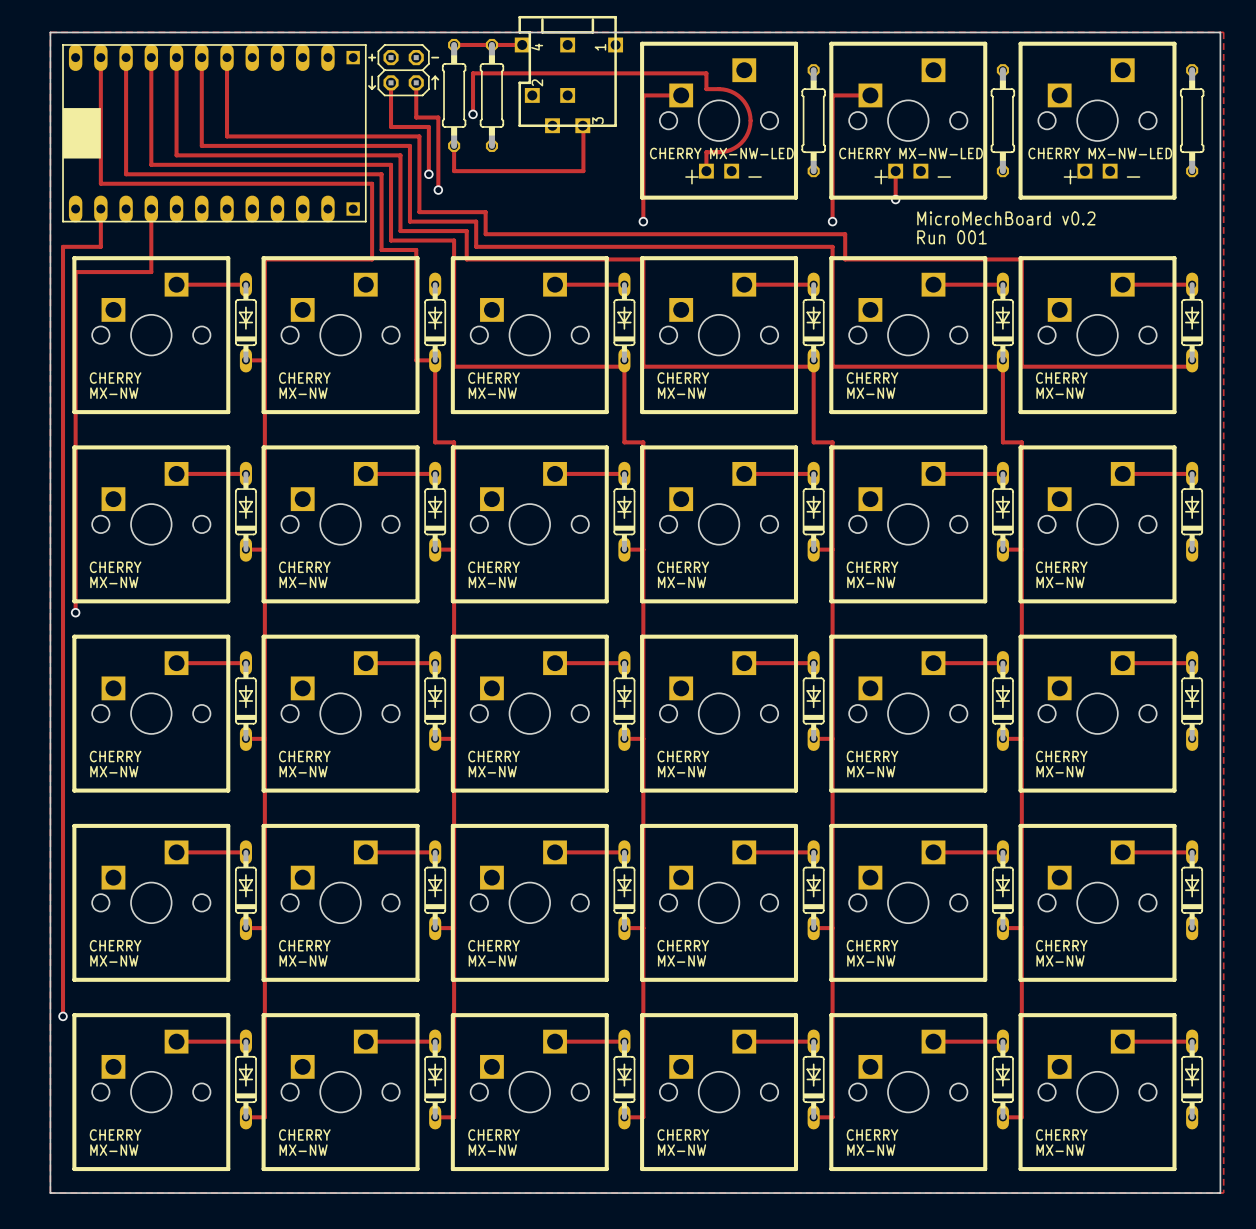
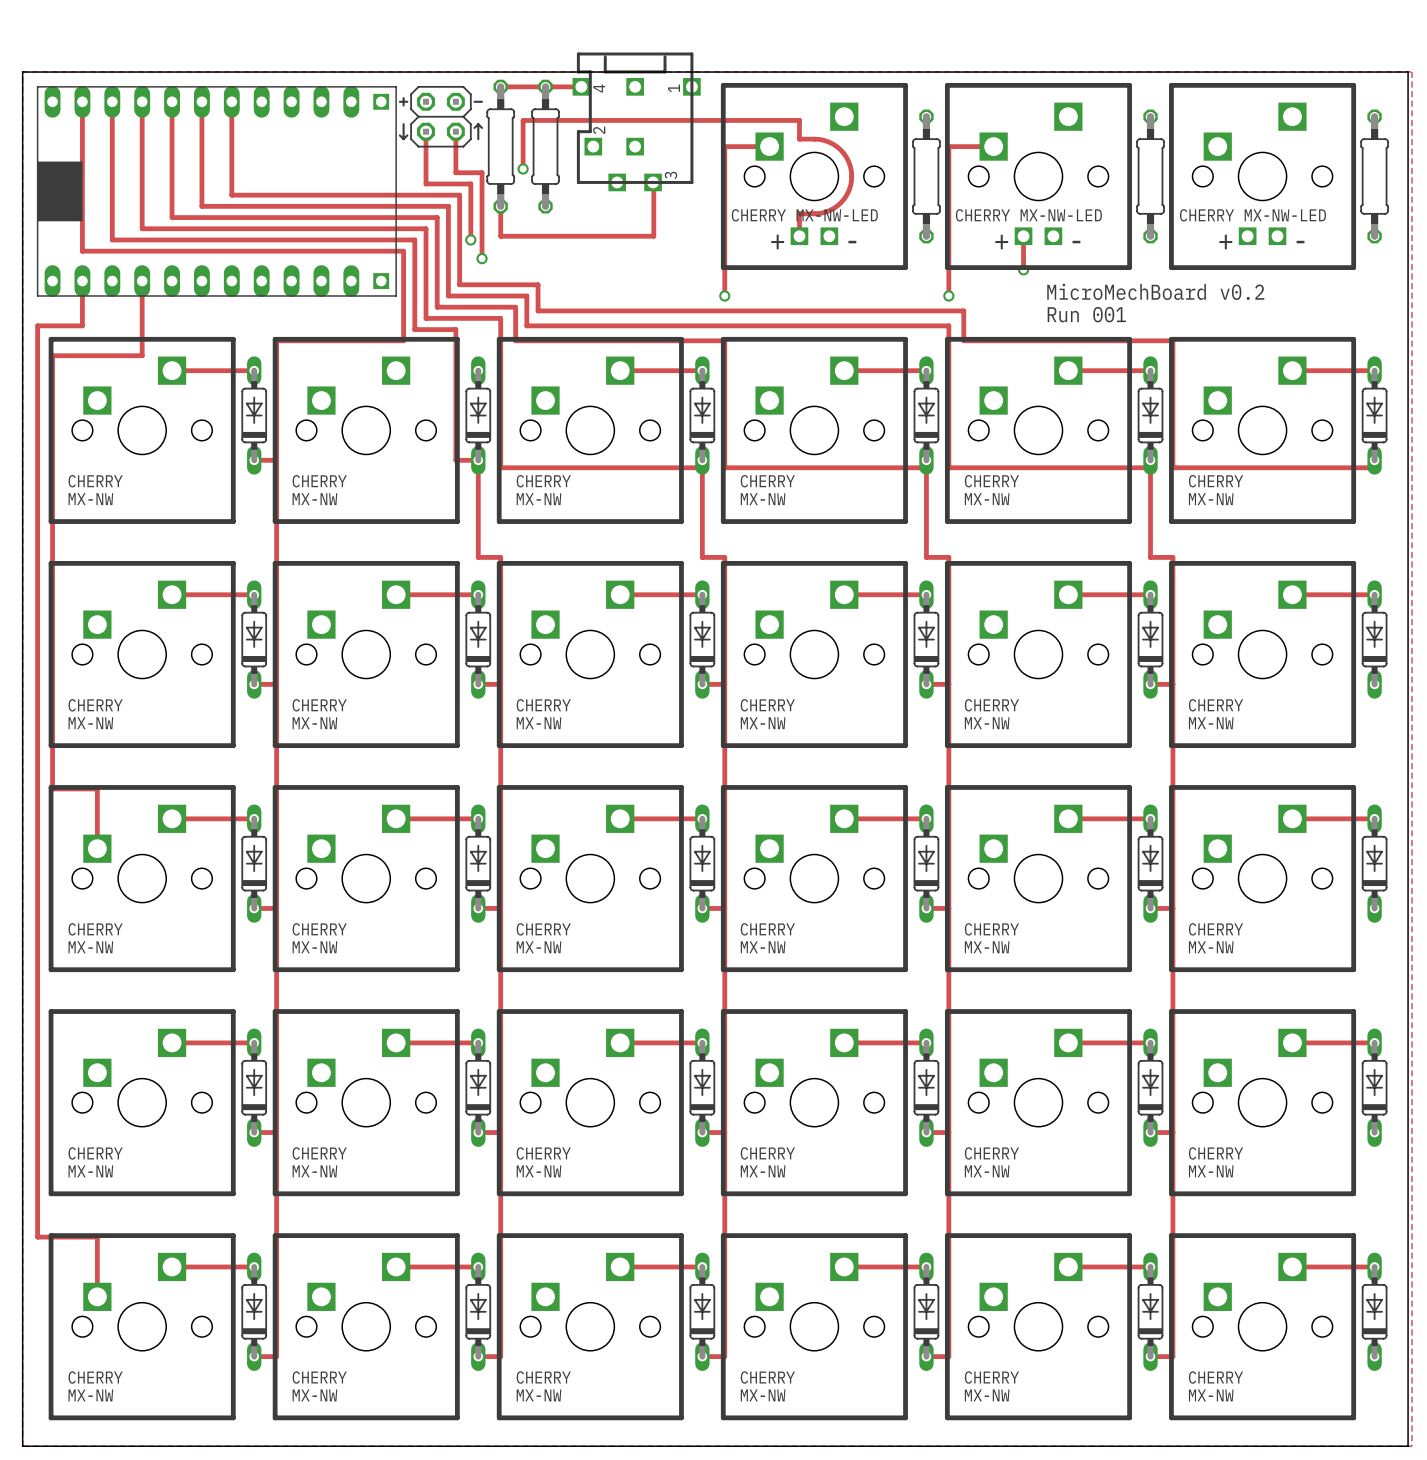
track: none -> (52, 759) (52, 788) (97, 788) (97, 848)
via: (75, 612) -> none
track: none -> (37, 1237) (97, 1237) (97, 1296)
via: (63, 1016) -> none

